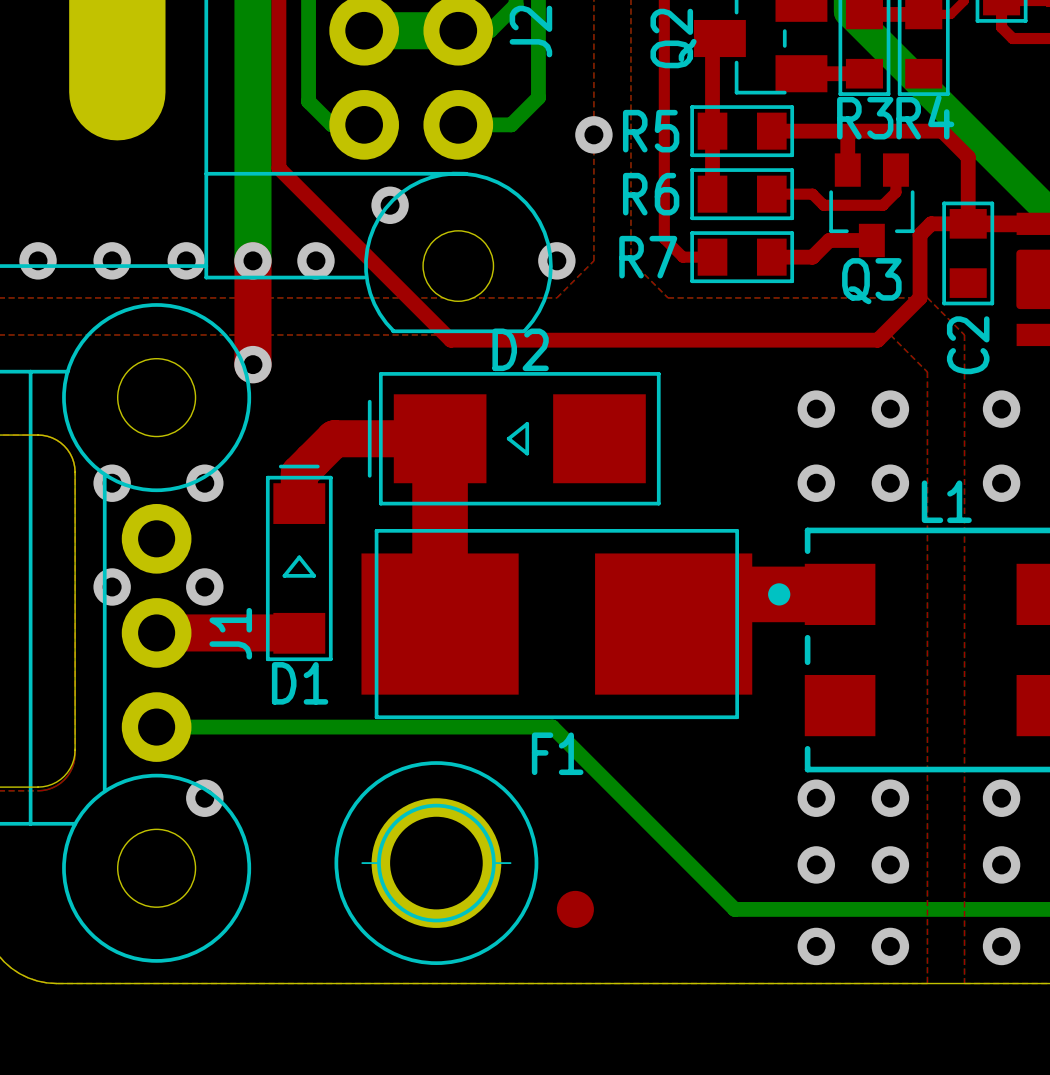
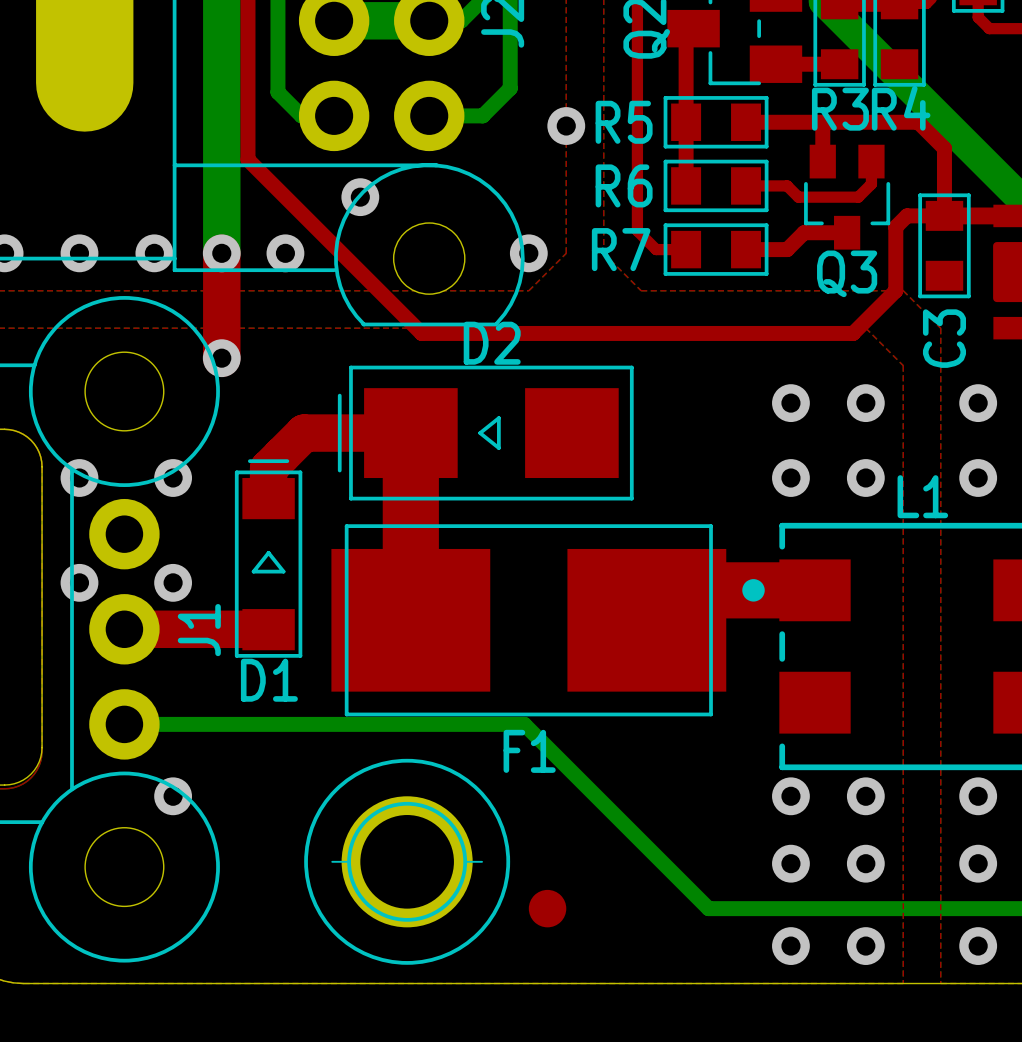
C2 name: C2 (968, 345) -> C3 (944, 338)

